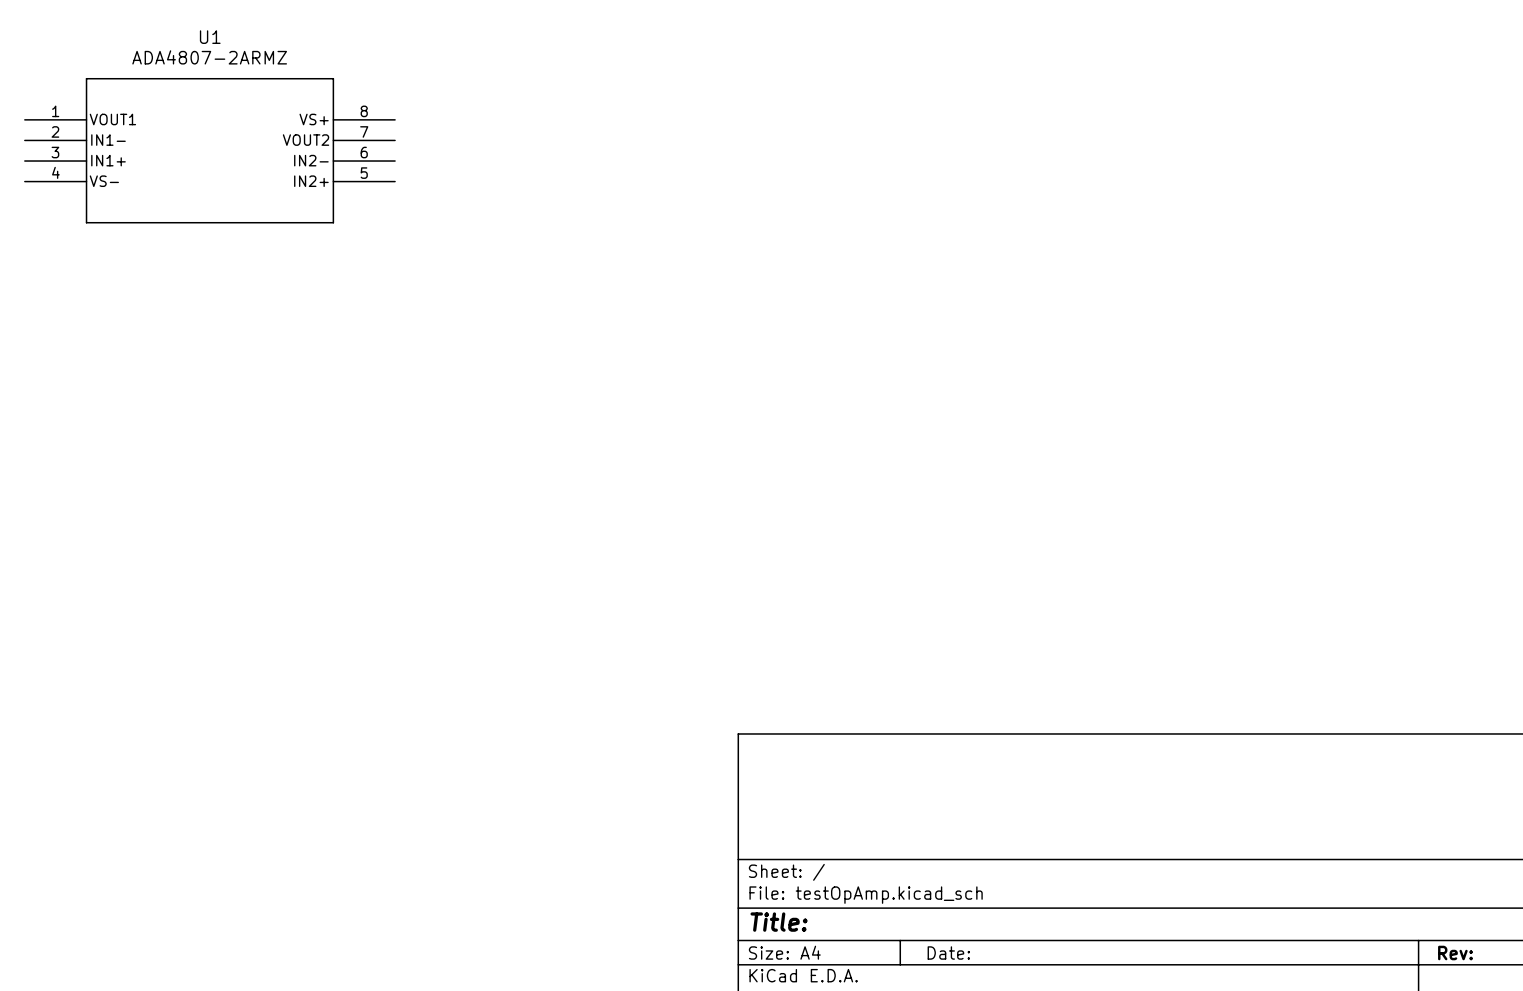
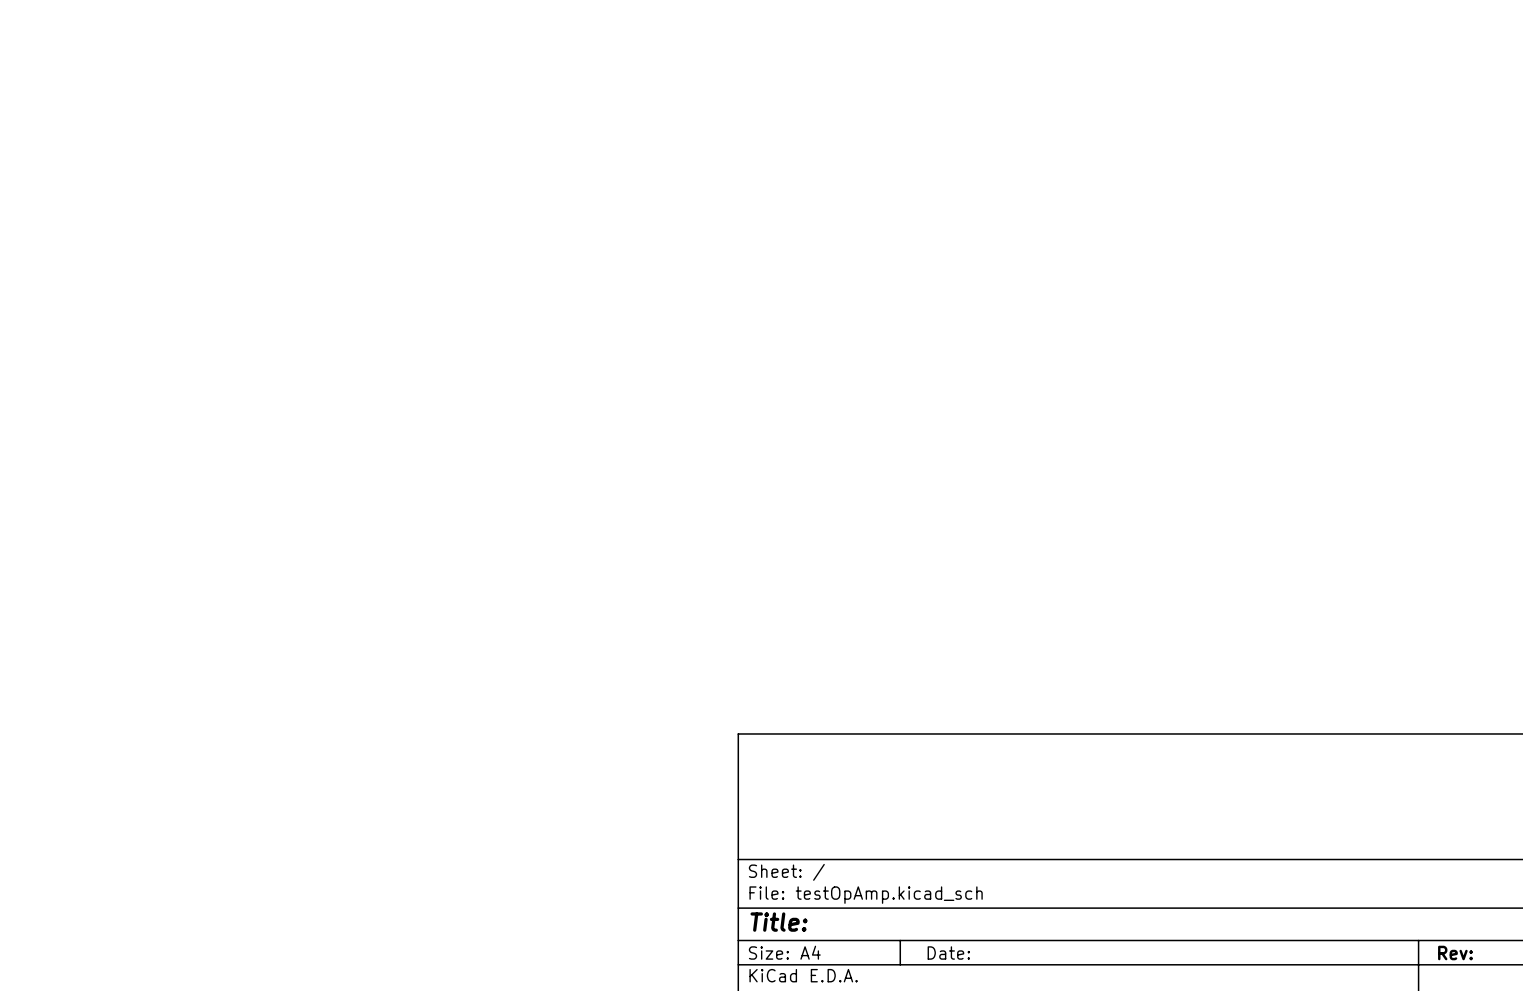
U1: ADA4807-2ARMZ (209, 150) -> none

